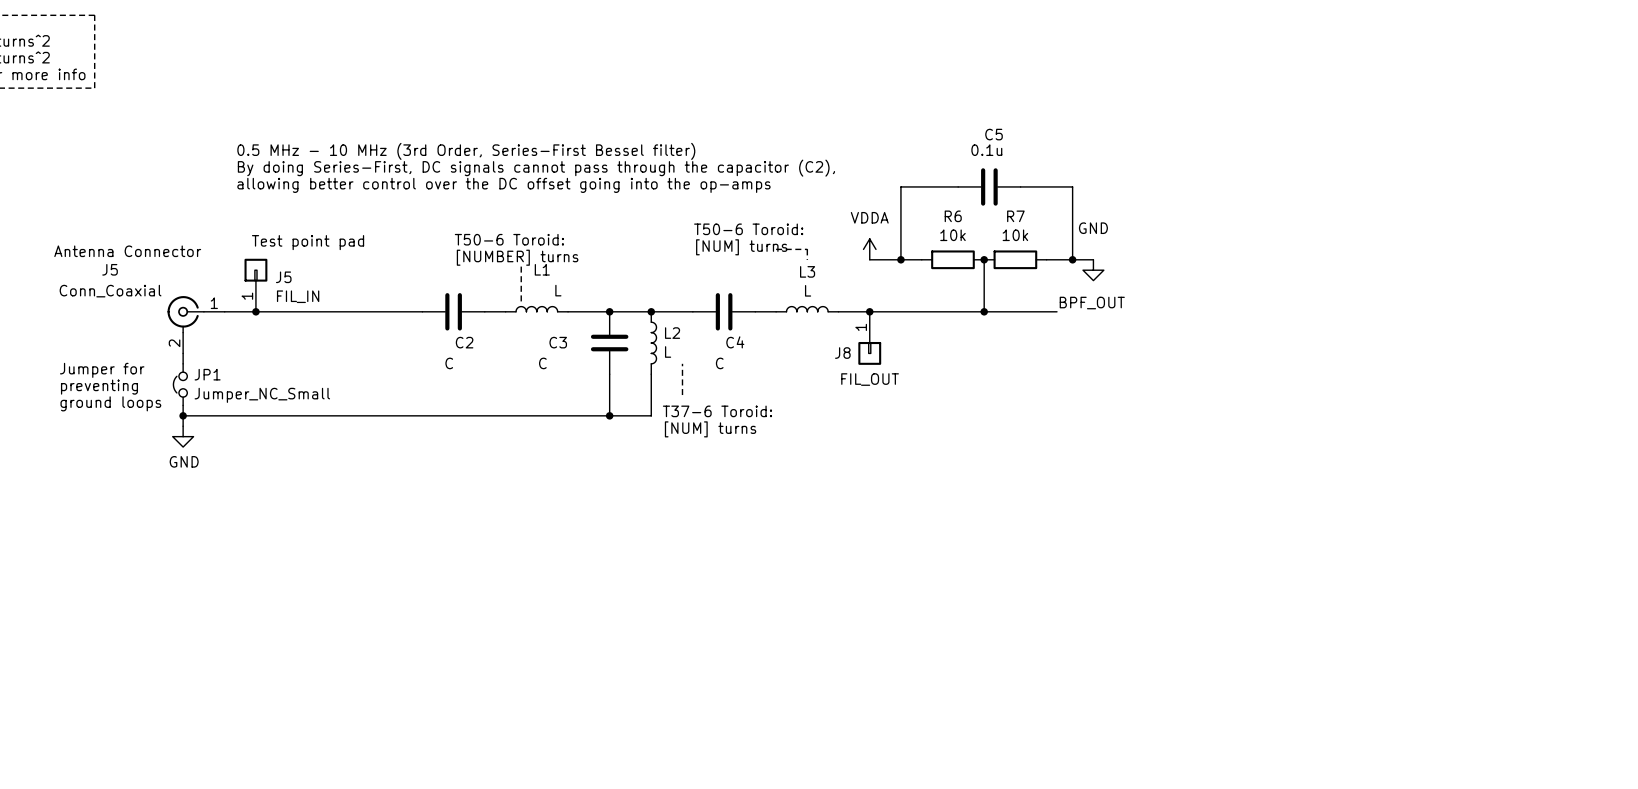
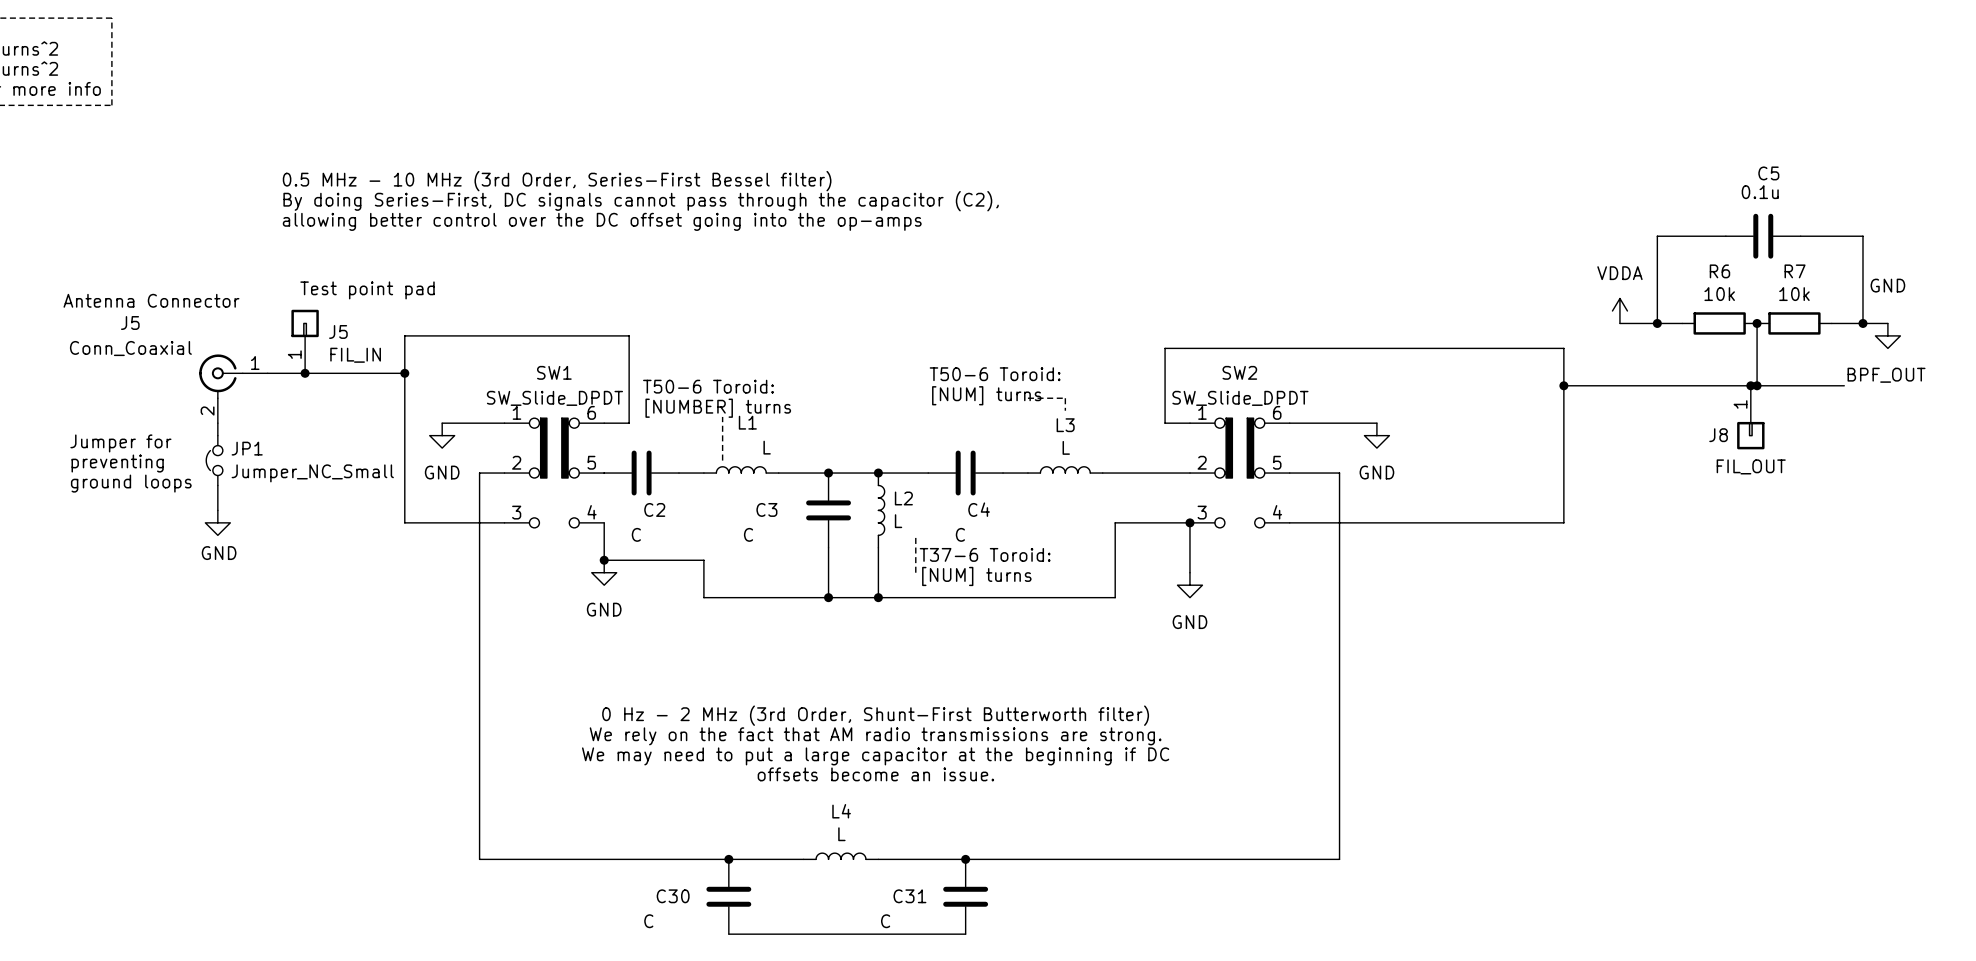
wire: (958, 186) (900, 186) (900, 259) -> none
C5 position: (989, 186) -> (1763, 236)
wire: (1020, 186) (1072, 186) (1072, 259) -> none
wire: none -> (1725, 236) (1657, 236) (1657, 323)
wire: none -> (1800, 236) (1862, 236) (1862, 323)
power symbol text position: GND (1093, 228) -> GND (1376, 472)
text: T50-6 Toroid: (748, 229) -> none
text: T50-6 Toroid: (509, 239) -> none
text: [NUM] turns (741, 247) -> none
line: (776, 249) (807, 249) (807, 259) -> (1027, 398) (1065, 398) (1065, 410)
power symbol: VDDA (869, 249) -> none
text position: [NUMBER] turns (517, 257) -> [NUMBER] turns (718, 408)
wire: (869, 259) (921, 259) -> none
junction: (900, 259) -> none
R6 position: (952, 259) -> (1719, 323)
wire: (984, 259) (984, 311) -> none
junction: (984, 259) -> none
R7 position: (1015, 259) -> (1794, 323)
wire: (1046, 259) (1093, 259) -> none
junction: (1072, 259) -> none
power symbol: none -> VDDA (1619, 311)
line: (521, 264) (521, 301) -> (722, 416) (722, 460)
power symbol position: GND (1093, 270) -> GND (1376, 435)
wire: none -> (1619, 323) (1682, 323)
junction: none -> (1657, 323)
wire: none -> (1757, 323) (1757, 385)
junction: none -> (1757, 323)
wire: none -> (1831, 323) (1887, 323)
junction: none -> (1862, 323)
power symbol: none -> GND (1887, 335)
label: BPF_OUT (1092, 303) -> none
L1 position: (536, 309) -> (741, 469)
L3 position: (807, 309) -> (1065, 469)
wire: (339, 311) (422, 311) -> none
junction: none -> (404, 373)
C2 position: (453, 311) -> (641, 473)
wire: (484, 311) (505, 311) -> (678, 473) (703, 473)
wire: (568, 311) (692, 311) -> (778, 473) (928, 473)
junction: (609, 311) -> none
junction: (651, 311) -> none
C4 position: (724, 311) -> (965, 473)
wire: (755, 311) (776, 311) -> (1003, 473) (1027, 473)
wire: (838, 311) (1057, 311) -> none
junction: (869, 311) -> none
junction: (984, 311) -> none
text: none -> T50-6 Toroid: (995, 374)
label: none -> BPF_OUT (1886, 375)
text: none -> T50-6 Toroid: (708, 386)
wire: none -> (1563, 385) (1844, 385)
junction: none -> (1563, 385)
junction: none -> (1750, 385)
junction: none -> (1757, 385)
text: none -> [NUM] turns (986, 395)
J8 position: (869, 338) -> (1750, 417)
C3 position: (609, 343) -> (828, 510)
L2 position: (653, 343) -> (881, 510)
wire: none -> (442, 423) (504, 423)
wire: none -> (604, 423) (629, 423) (629, 335) (404, 335) (404, 522) (504, 522)
wire: none -> (1189, 423) (1165, 423) (1165, 348) (1563, 348) (1563, 522) (1289, 522)
wire: none -> (1289, 423) (1376, 423)
power symbol: none -> GND (442, 435)
line: (682, 363) (682, 395) -> (915, 535) (915, 572)
wire: (609, 374) (609, 415) -> (828, 547) (828, 597)
wire: (651, 374) (651, 415) (183, 415) -> none
wire: none -> (504, 473) (479, 473) (479, 859) (803, 859)
SW1: none -> SW_Slide_DPDT (554, 473)
junction: none -> (828, 473)
junction: none -> (878, 473)
wire: none -> (1102, 473) (1189, 473)
SW2: none -> SW_Slide_DPDT (1239, 473)
wire: none -> (1289, 473) (1339, 473) (1339, 859) (878, 859)
text position: T37-6 Toroid: (717, 411) -> T37-6 Toroid: (985, 554)
junction: (183, 415) -> none
junction: (609, 415) -> none
text: [NUM] turns (710, 429) -> none
wire: none -> (604, 522) (604, 560) (703, 560) (703, 597) (1115, 597) (1115, 522) (1189, 522) (1189, 572)
junction: none -> (1189, 522)
wire: none -> (878, 547) (878, 597)
junction: none -> (604, 560)
power symbol: none -> GND (604, 572)
text: none -> [NUM] turns (976, 576)
power symbol: none -> GND (1189, 585)
junction: none -> (828, 597)
junction: none -> (878, 597)
text: none -> 0 Hz - 2 MHz (3rd Order, Shunt-First Butterworth filter) (875, 715)
text: none -> We rely on the fact that AM radio transmissions are strong. (875, 736)
text: none -> We may need to put a large capacitor at the beginning if DC (875, 756)
text: none -> offsets become an issue. (875, 774)
L4: none -> L (841, 856)
junction: none -> (728, 859)
junction: none -> (965, 859)
C30: none -> C (728, 896)
C31: none -> C (965, 896)
wire: none -> (728, 934) (965, 934)

